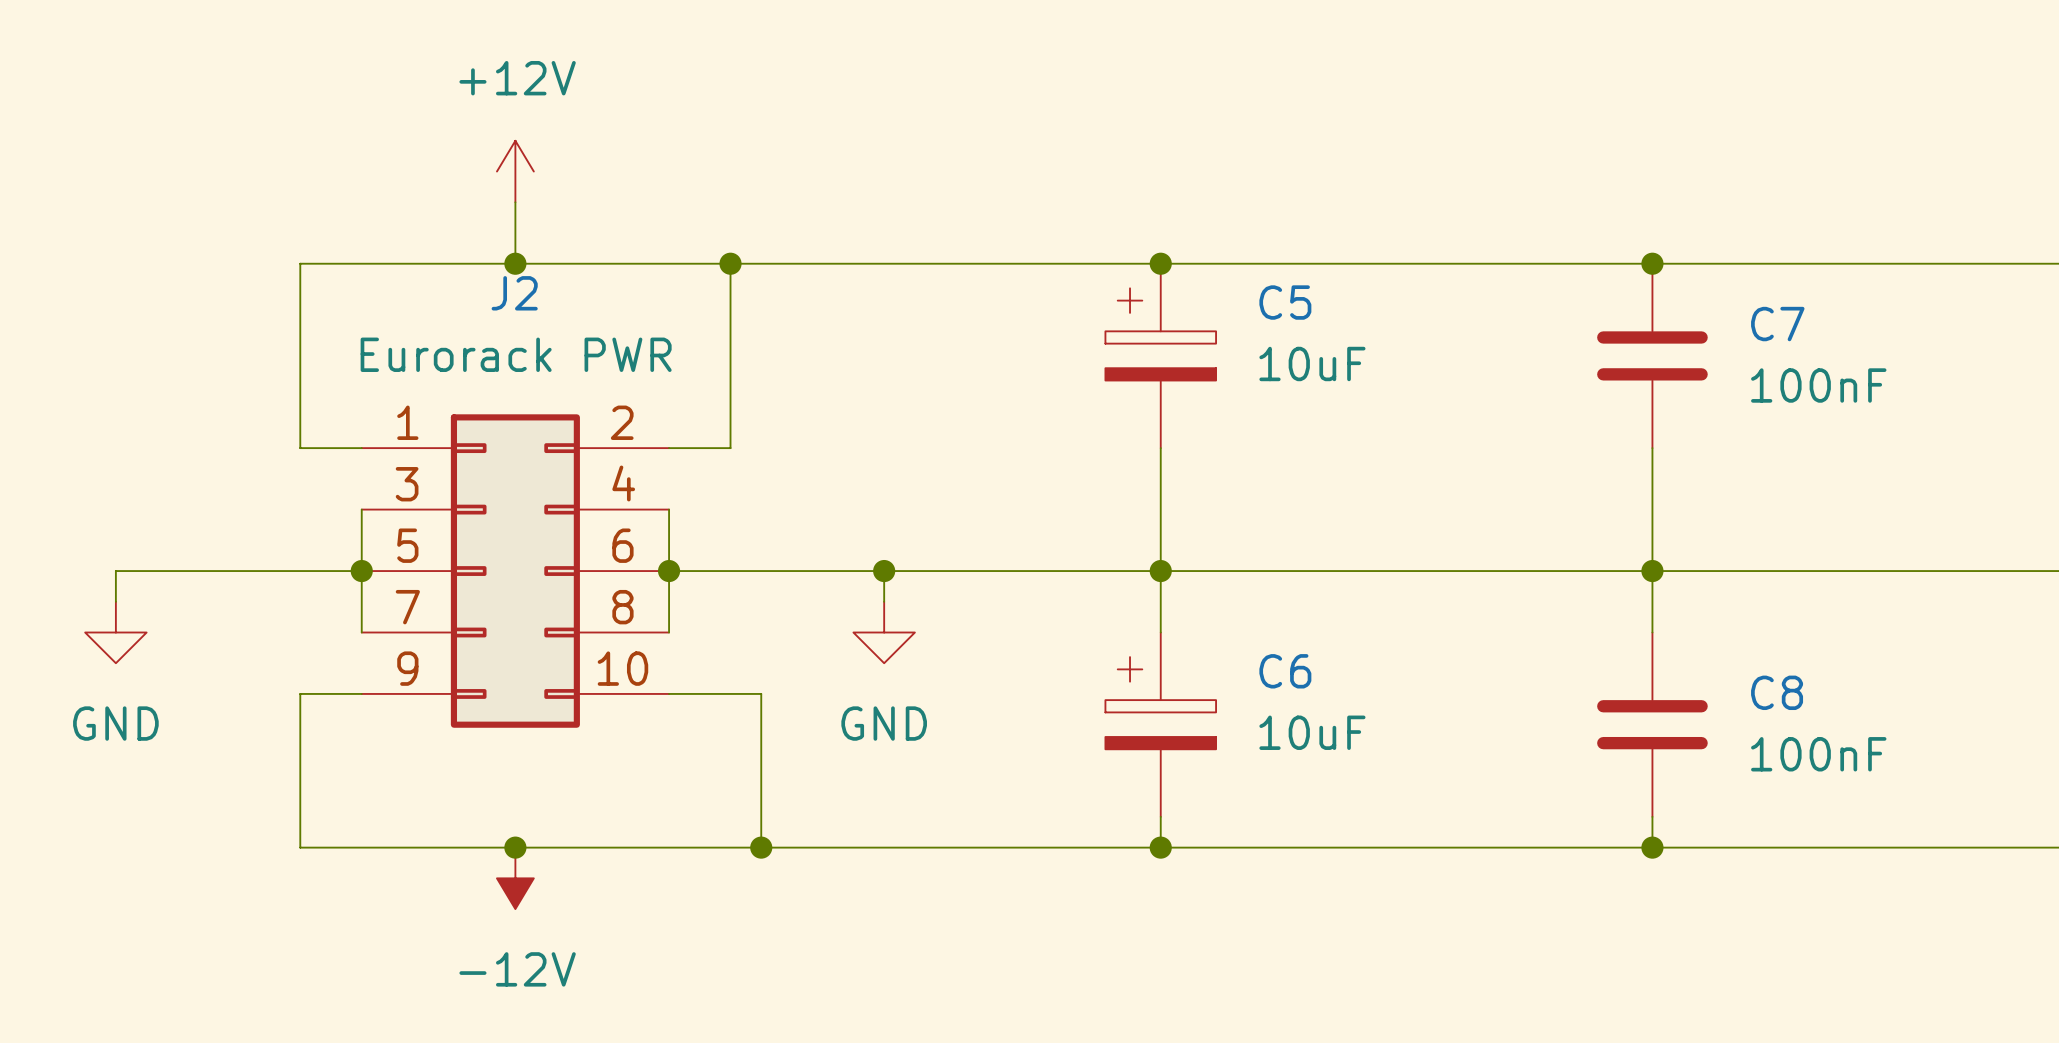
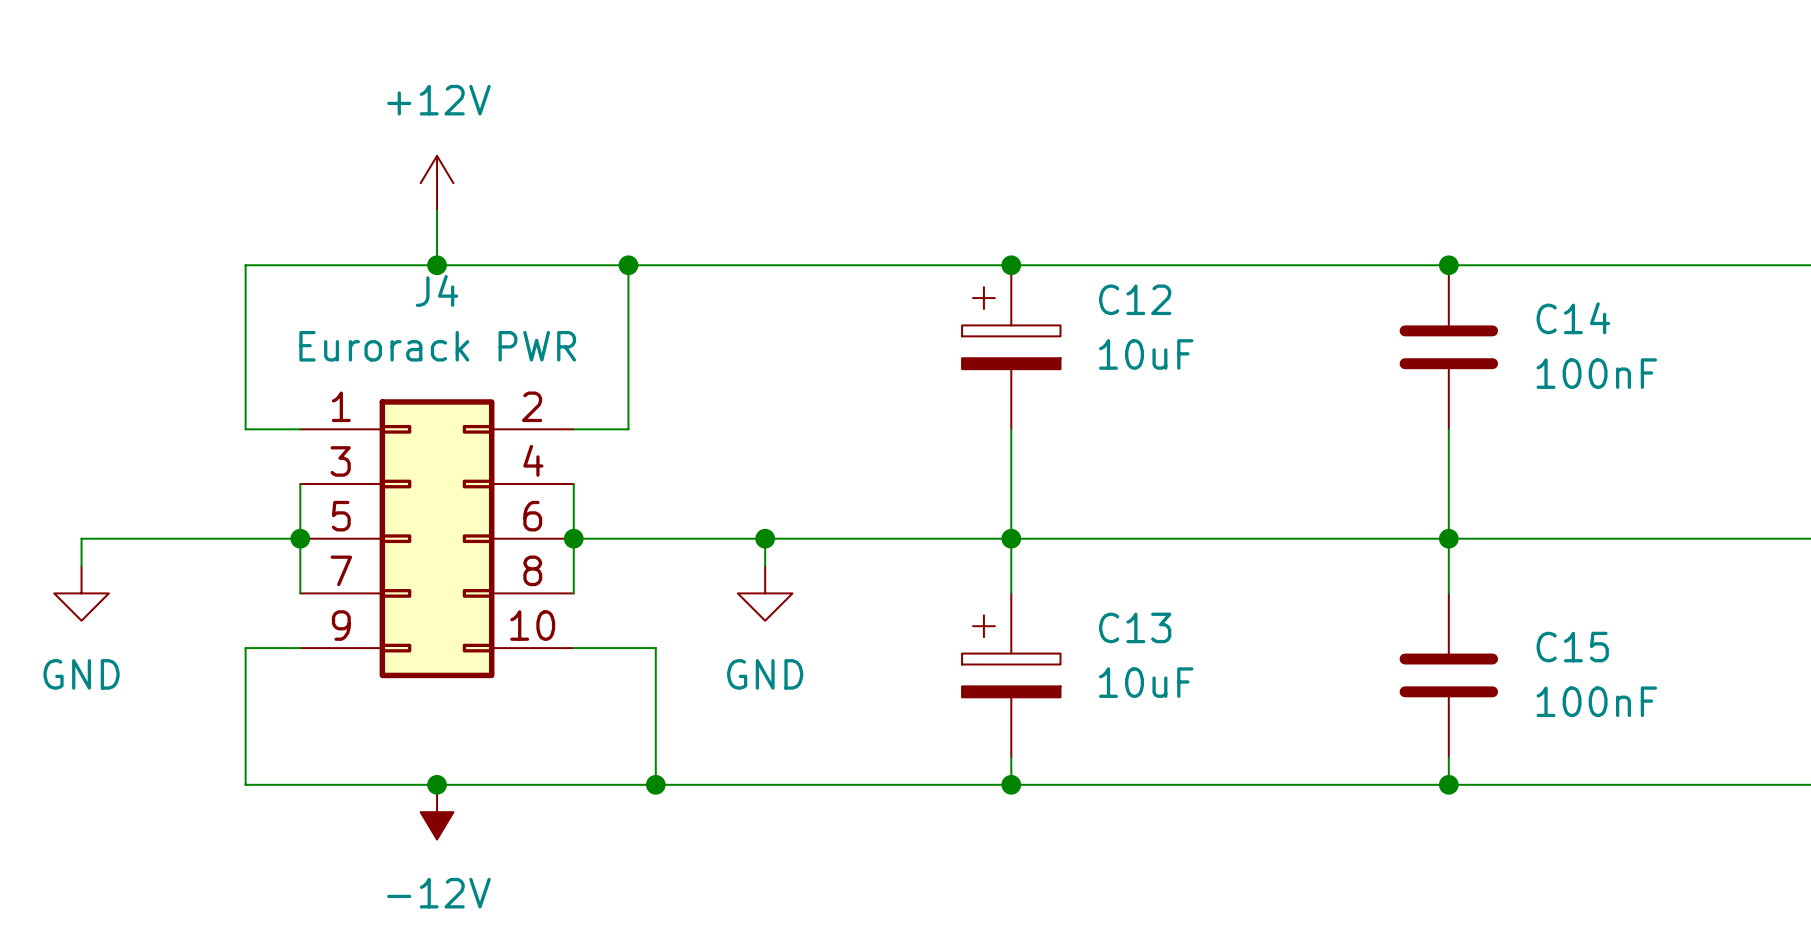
J2 name: J2 (514, 293) -> J4 (437, 290)
C5 name: C5 (1285, 302) -> C12 (1135, 299)
C7 name: C7 (1777, 324) -> C14 (1573, 318)
C6 name: C6 (1285, 671) -> C13 (1135, 627)
C8 name: C8 (1777, 692) -> C15 (1572, 647)

